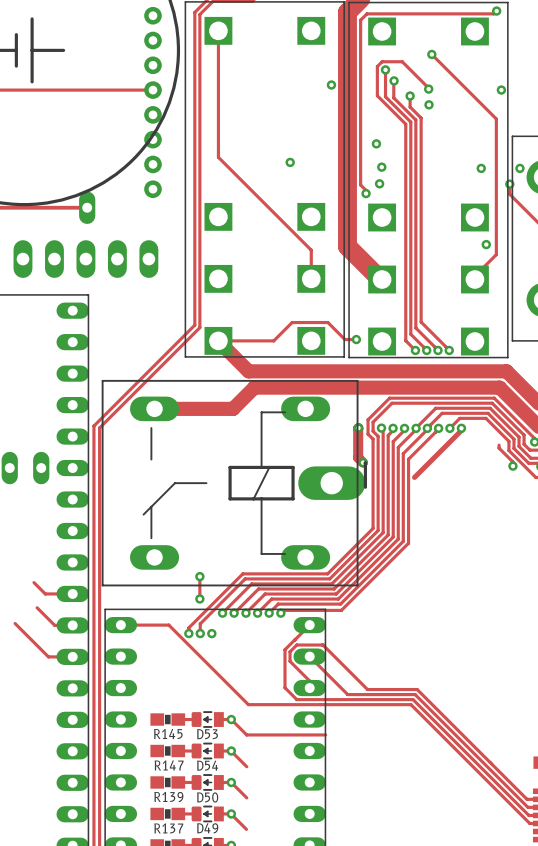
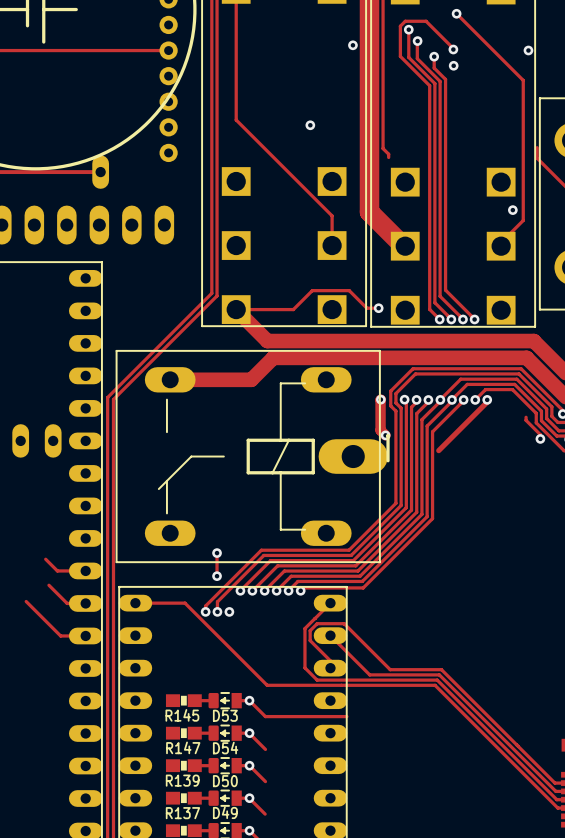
via: (376, 143) -> none
via: (381, 167) -> none
via: (481, 168) -> none
via: (519, 168) -> none
via: (379, 183) -> none
via: (509, 184) -> none
via: (366, 193) -> none

